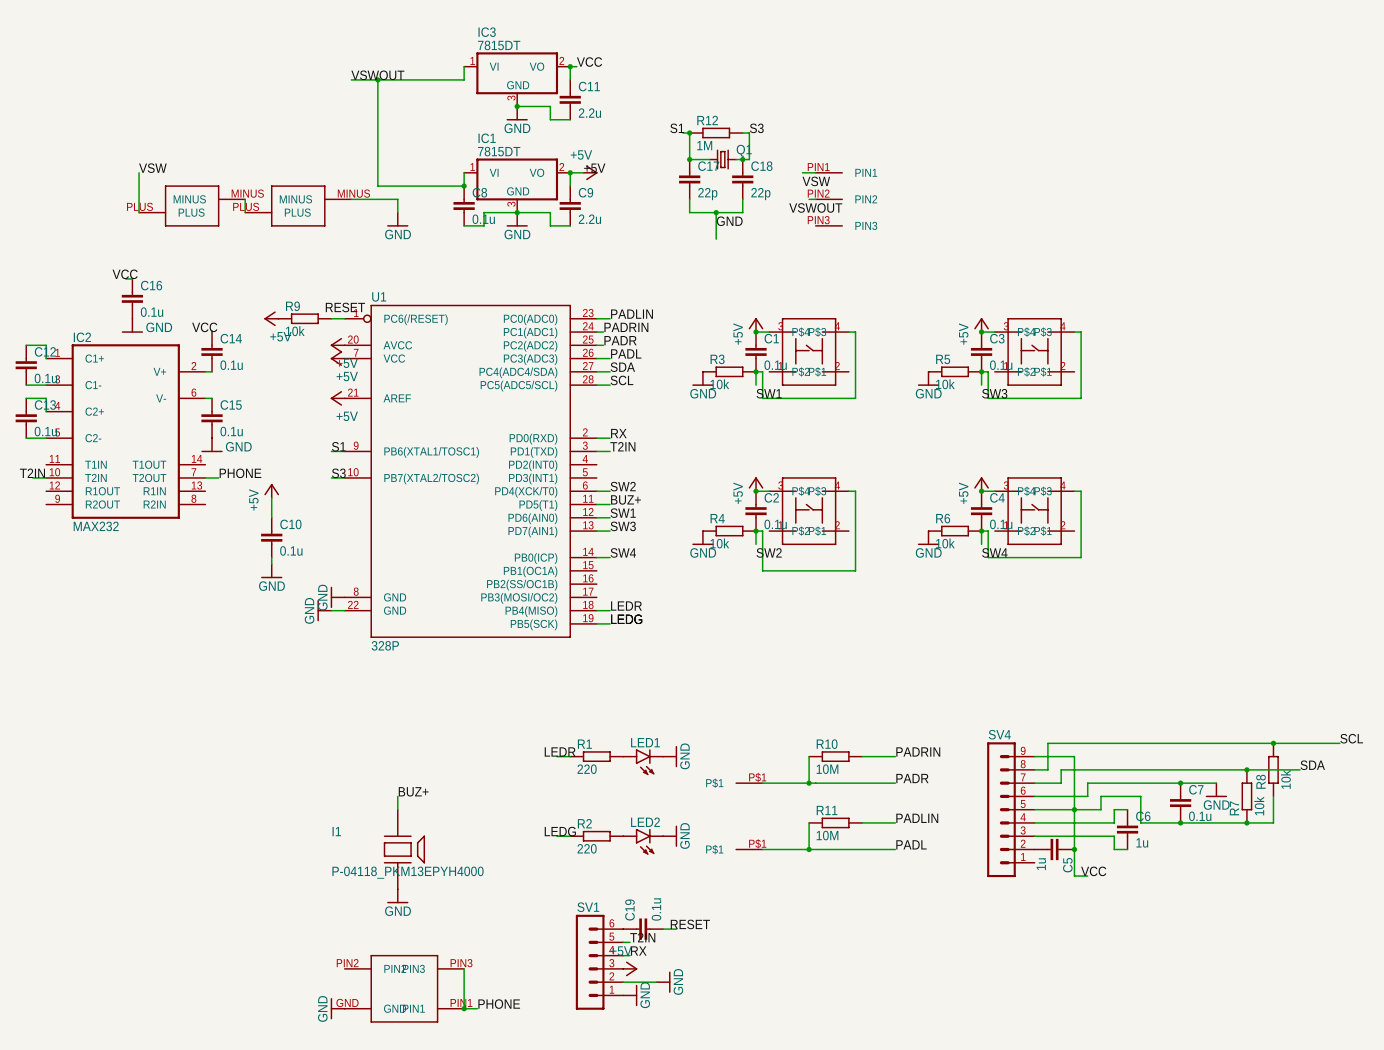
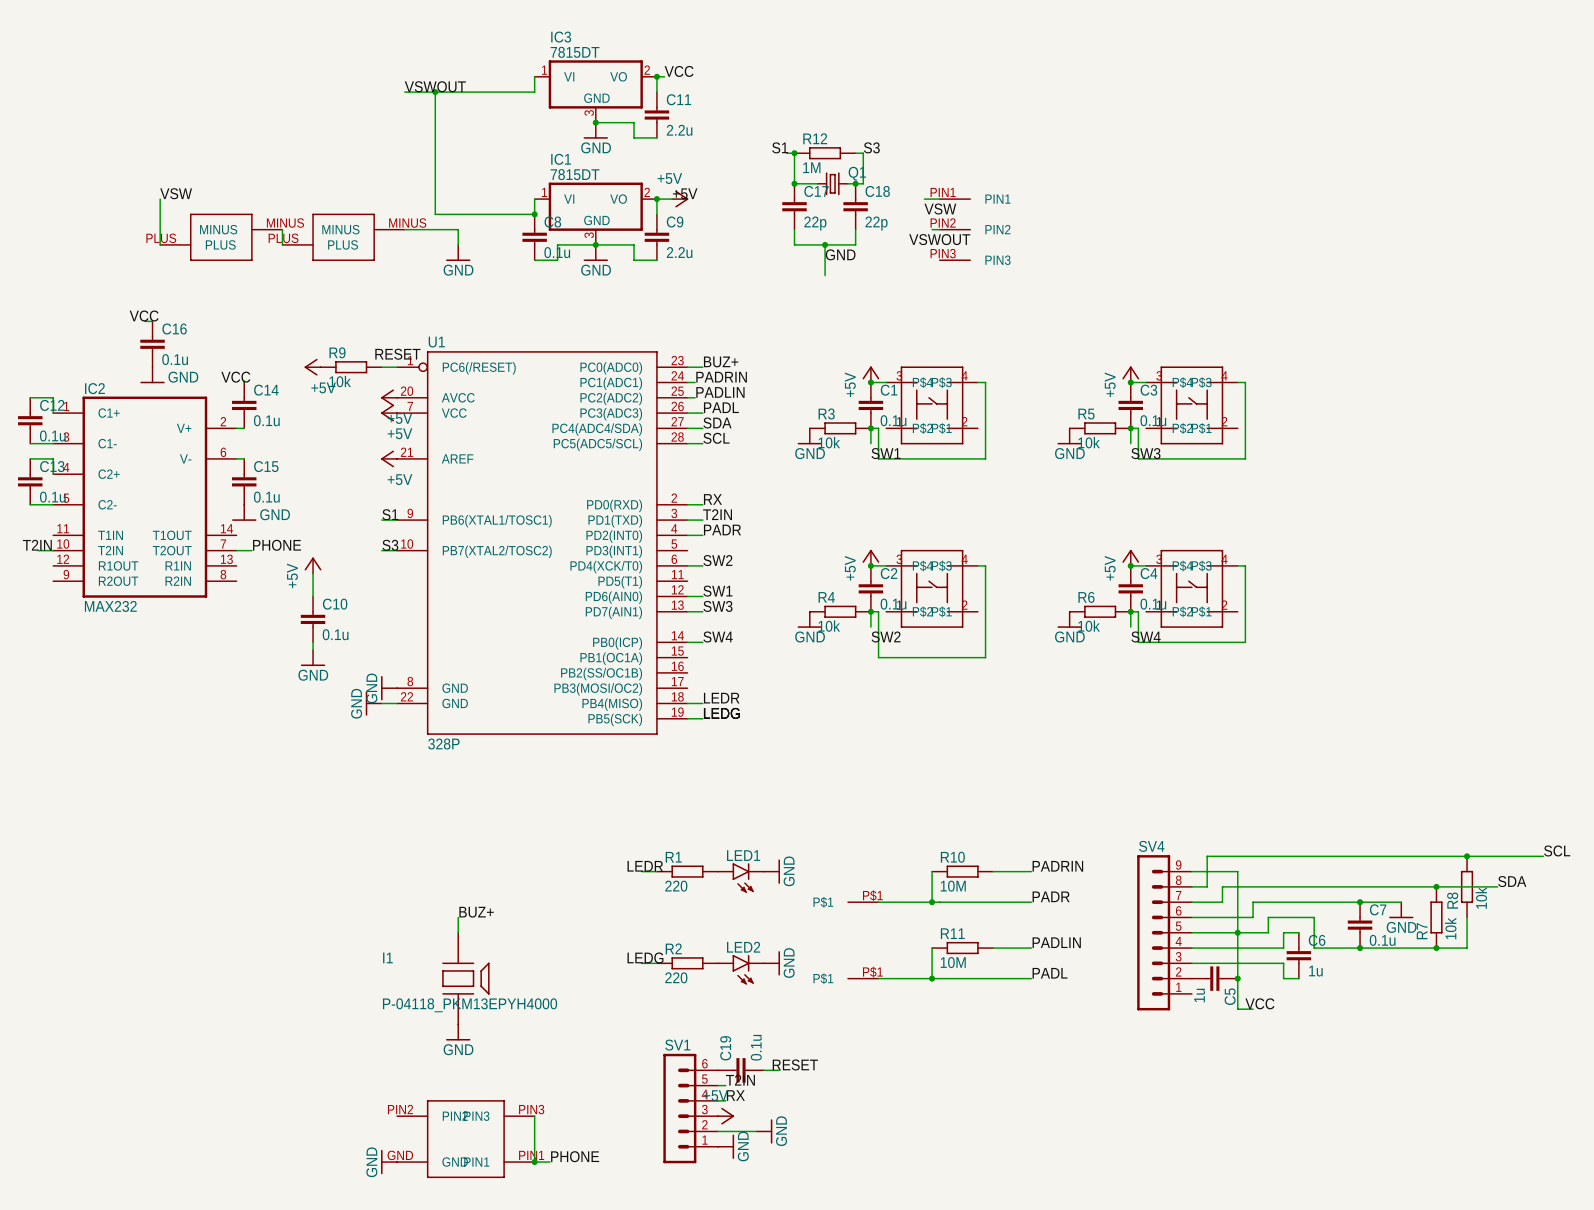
label: PADLIN (632, 314) -> BUZ+ (721, 361)
label: PADR (620, 340) -> PADLIN (720, 392)
label: none -> PADR (722, 530)
label: BUZ+ (625, 499) -> none
wire: (596, 504) (610, 504) -> (687, 535) (702, 535)

